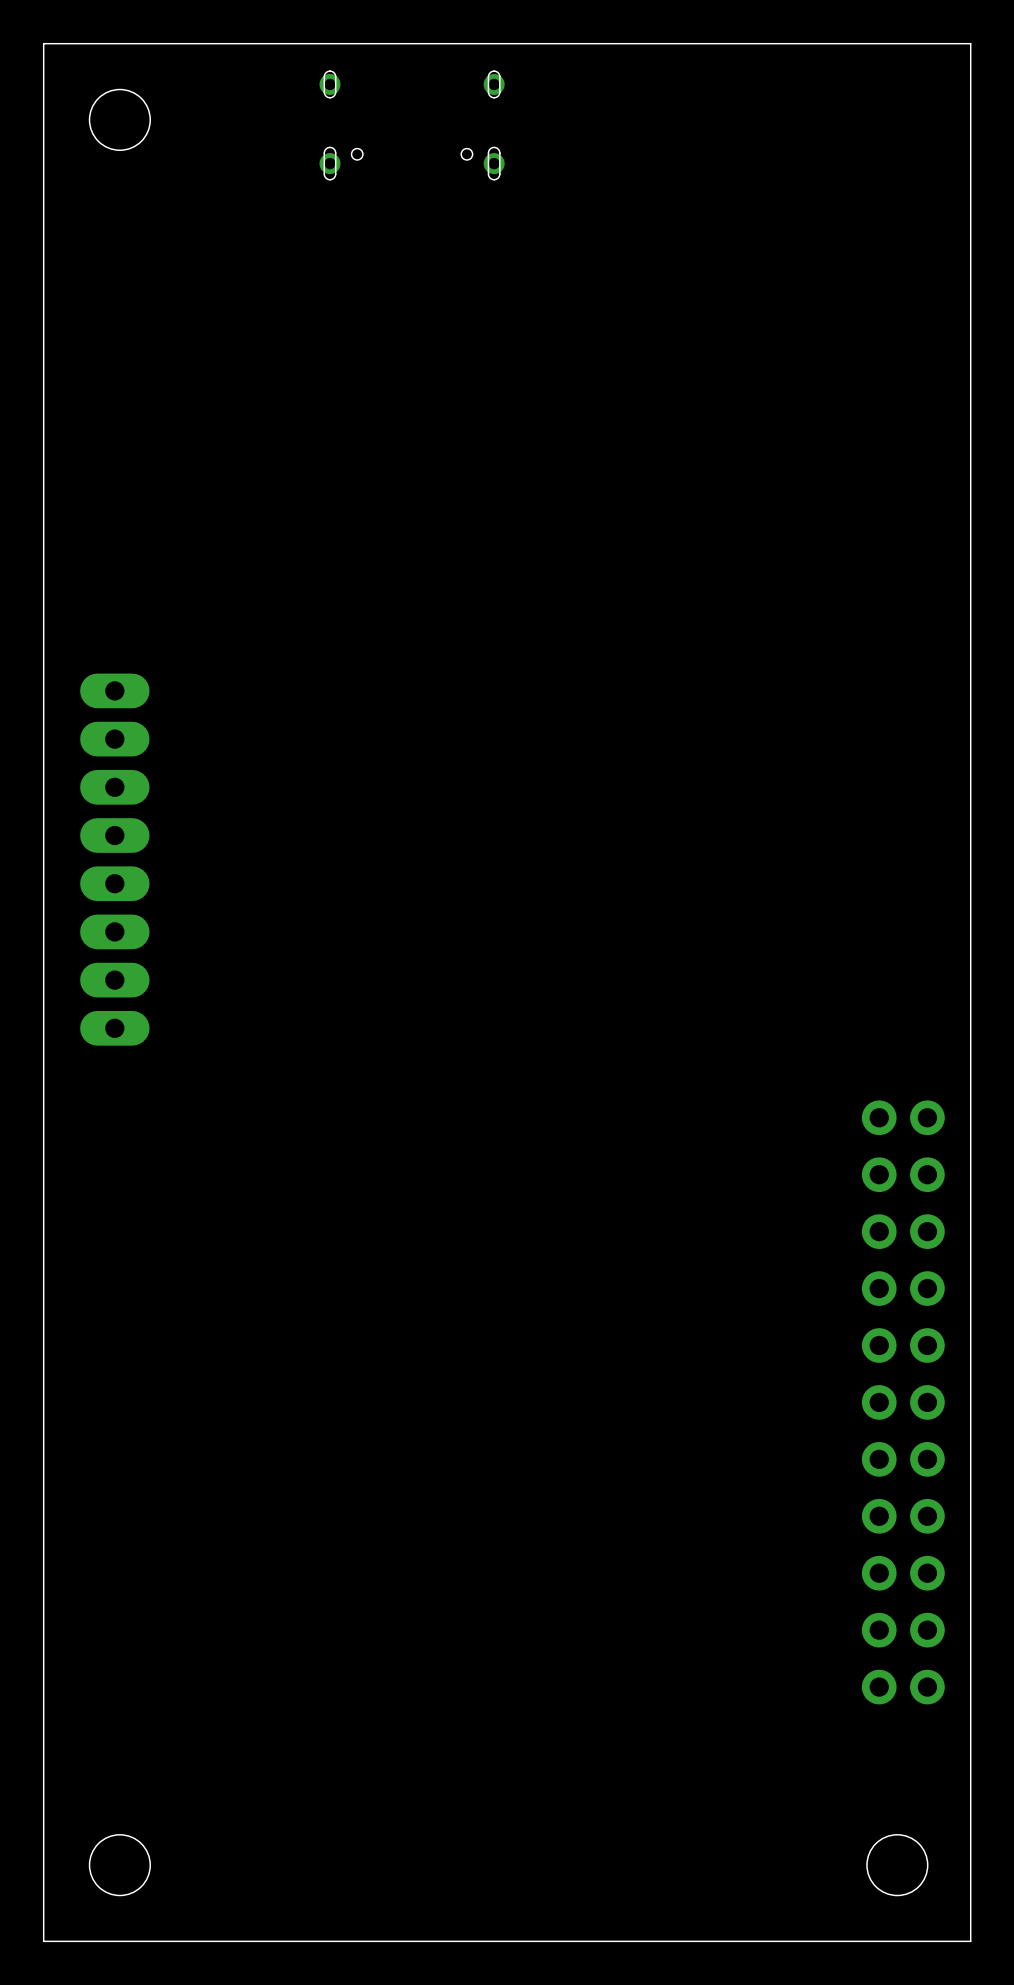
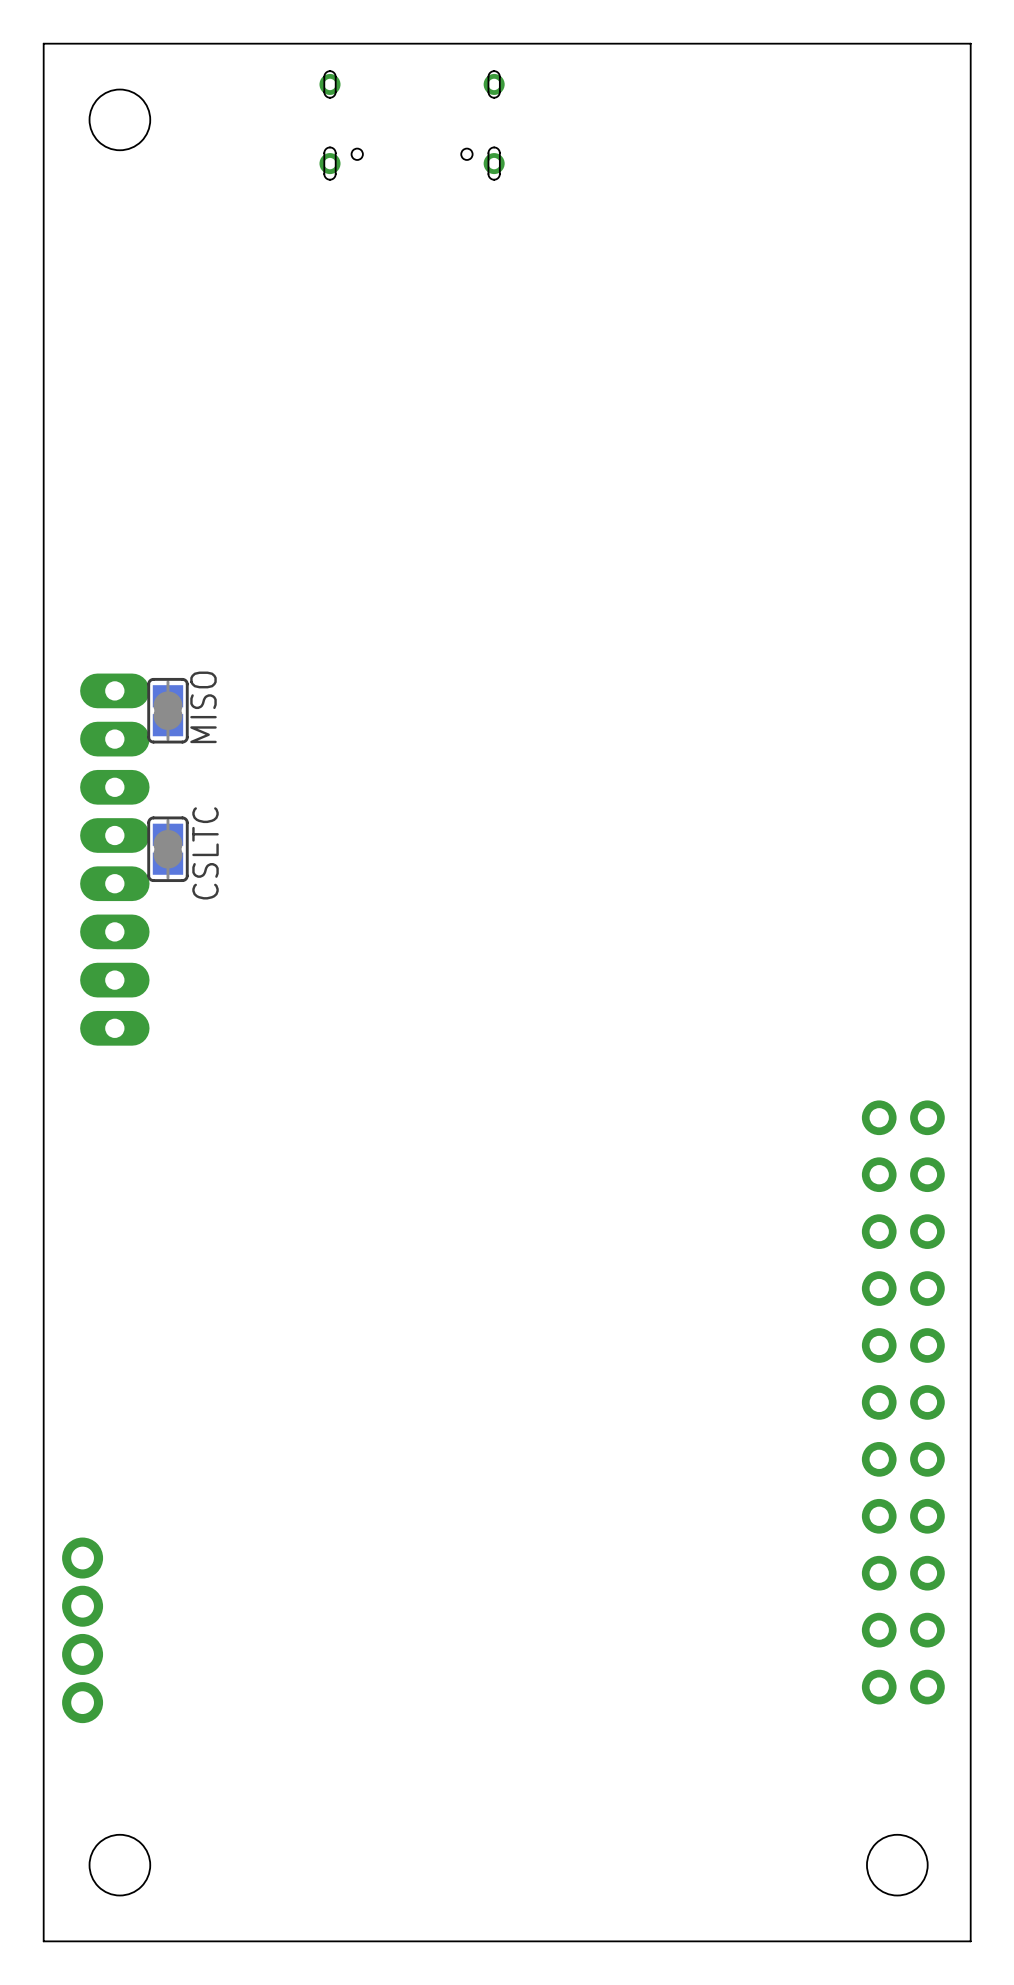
MISO: none -> (167, 710)
CSLTC: none -> (167, 849)
part: none -> (82, 1630)

